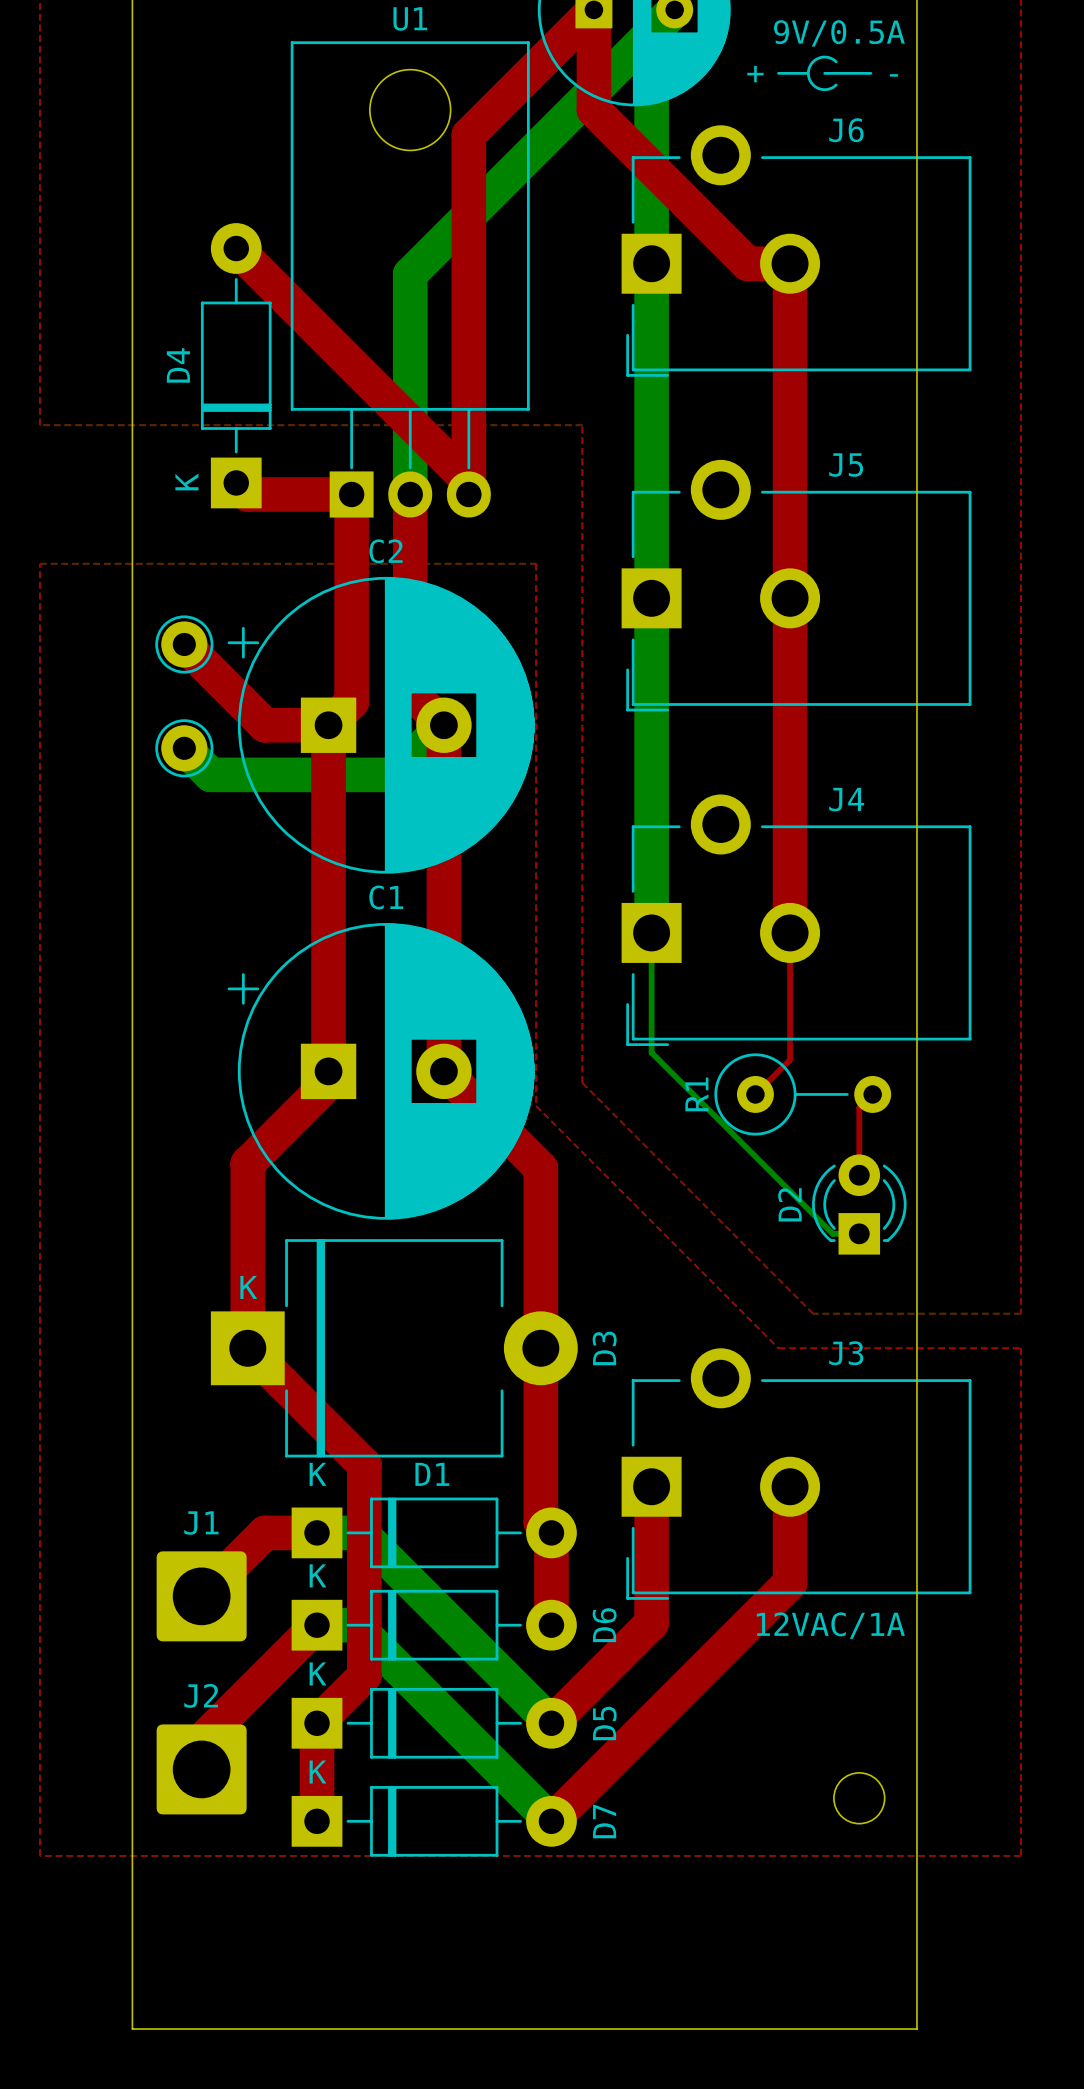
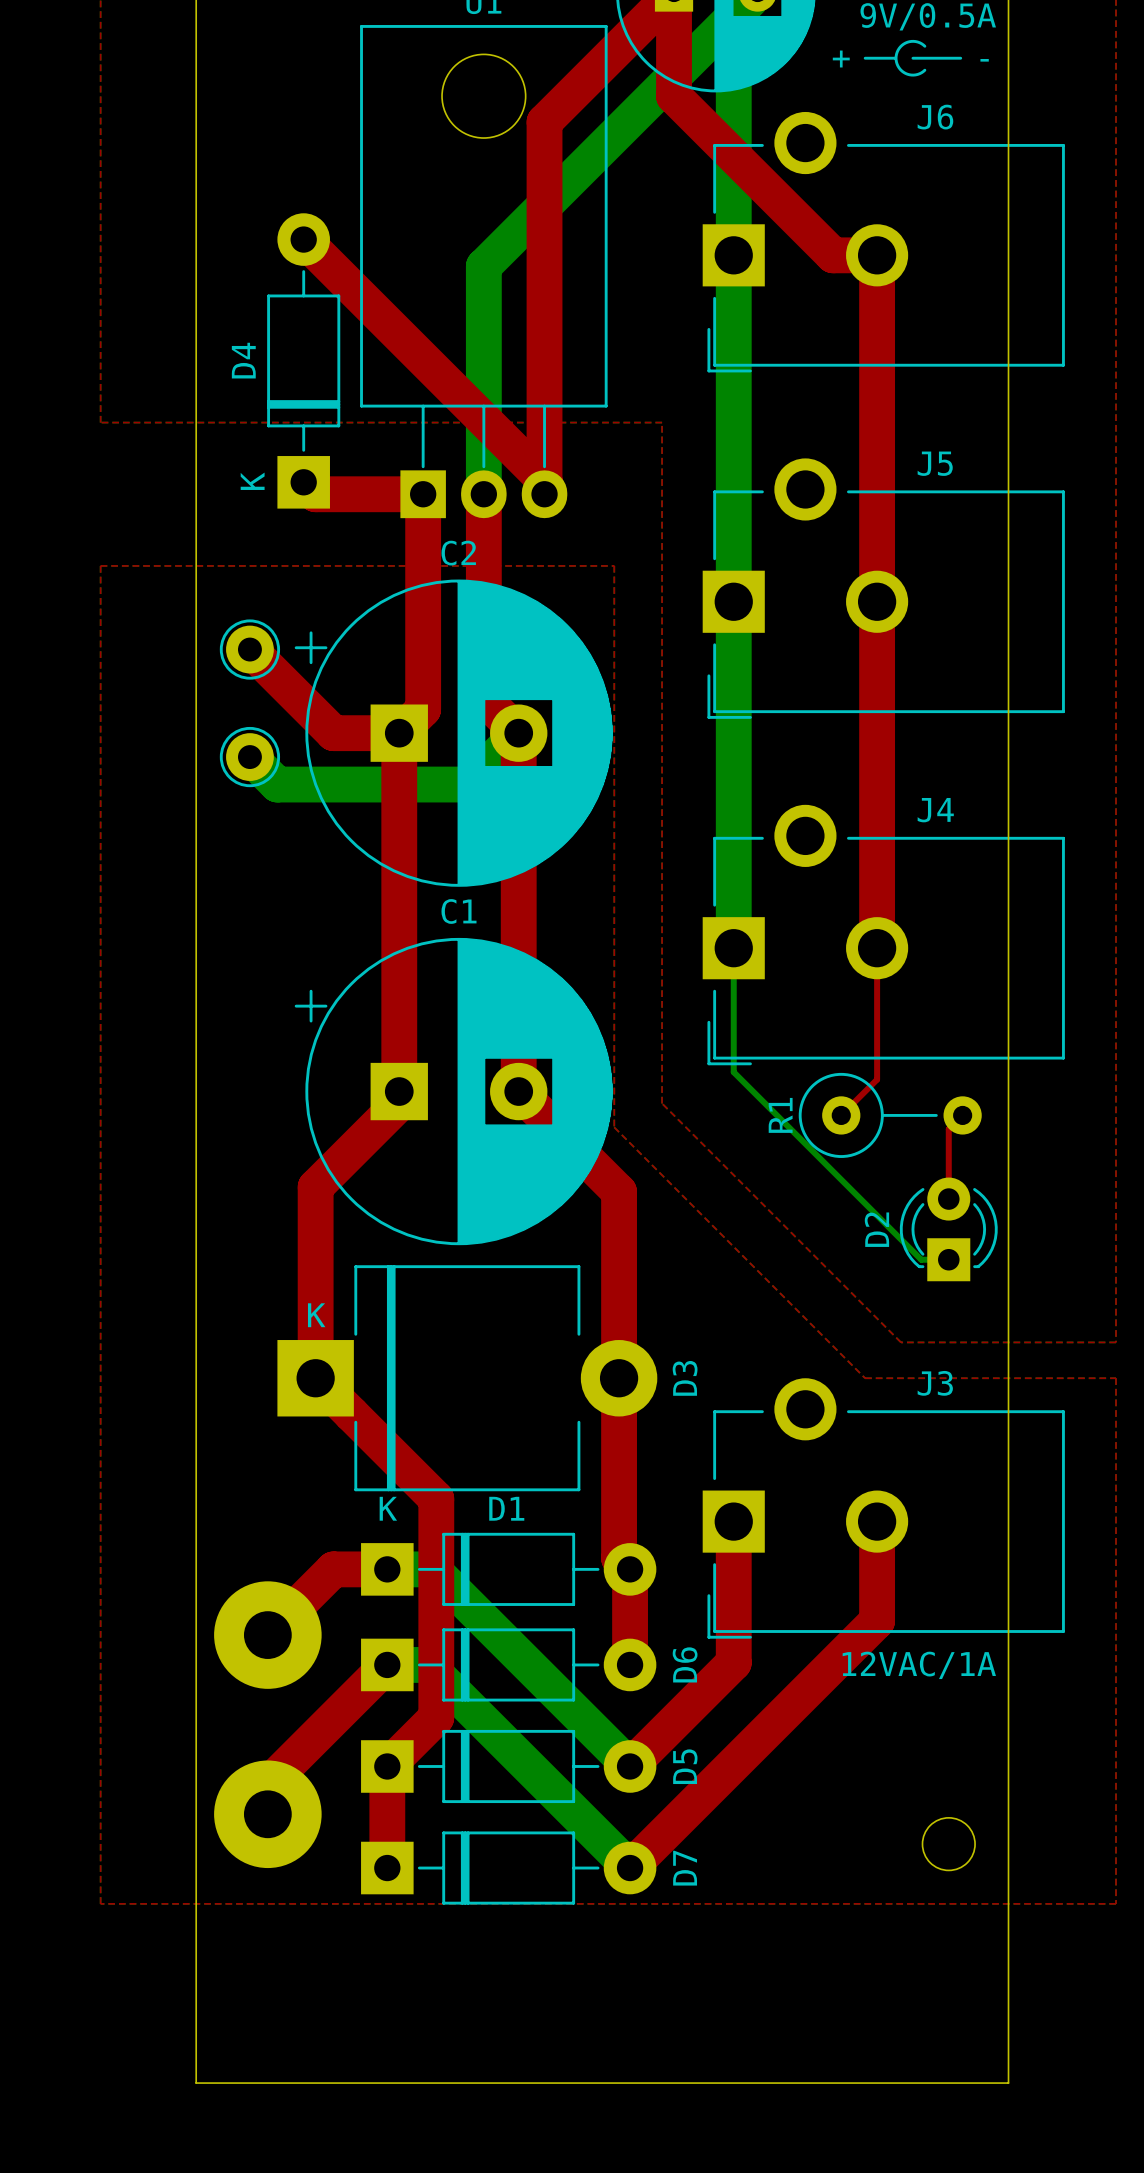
D6 text: K (318, 1575) -> none
J1: (201, 1596) -> none
part: none -> (267, 1635)
D5 text: K (318, 1673) -> none
J2: (201, 1769) -> none
part: none -> (267, 1814)
D7 text: K (318, 1772) -> none

